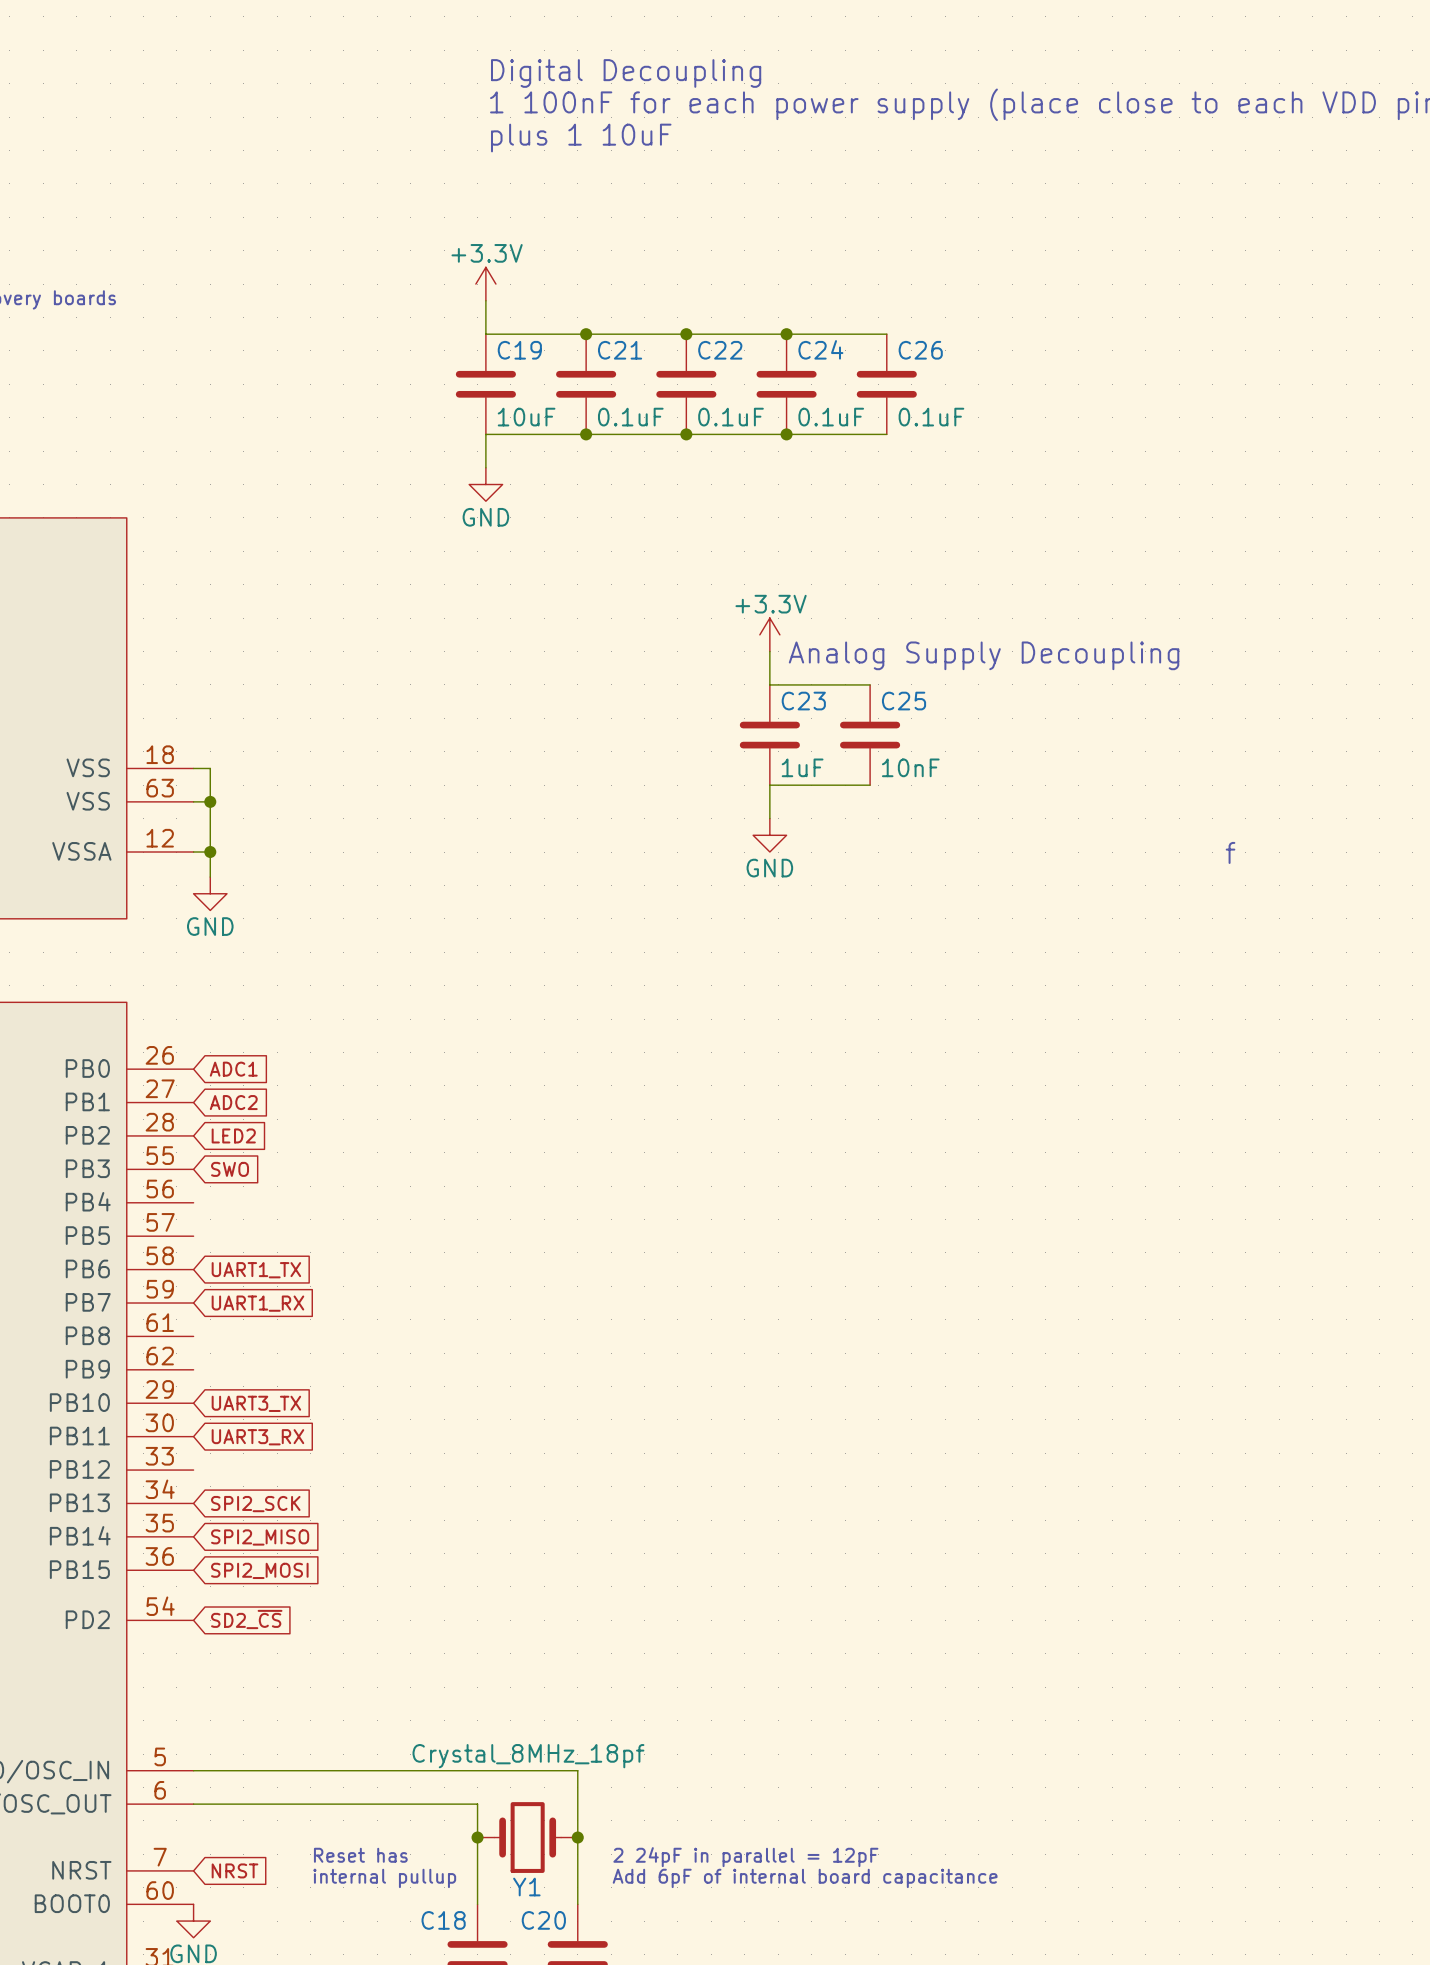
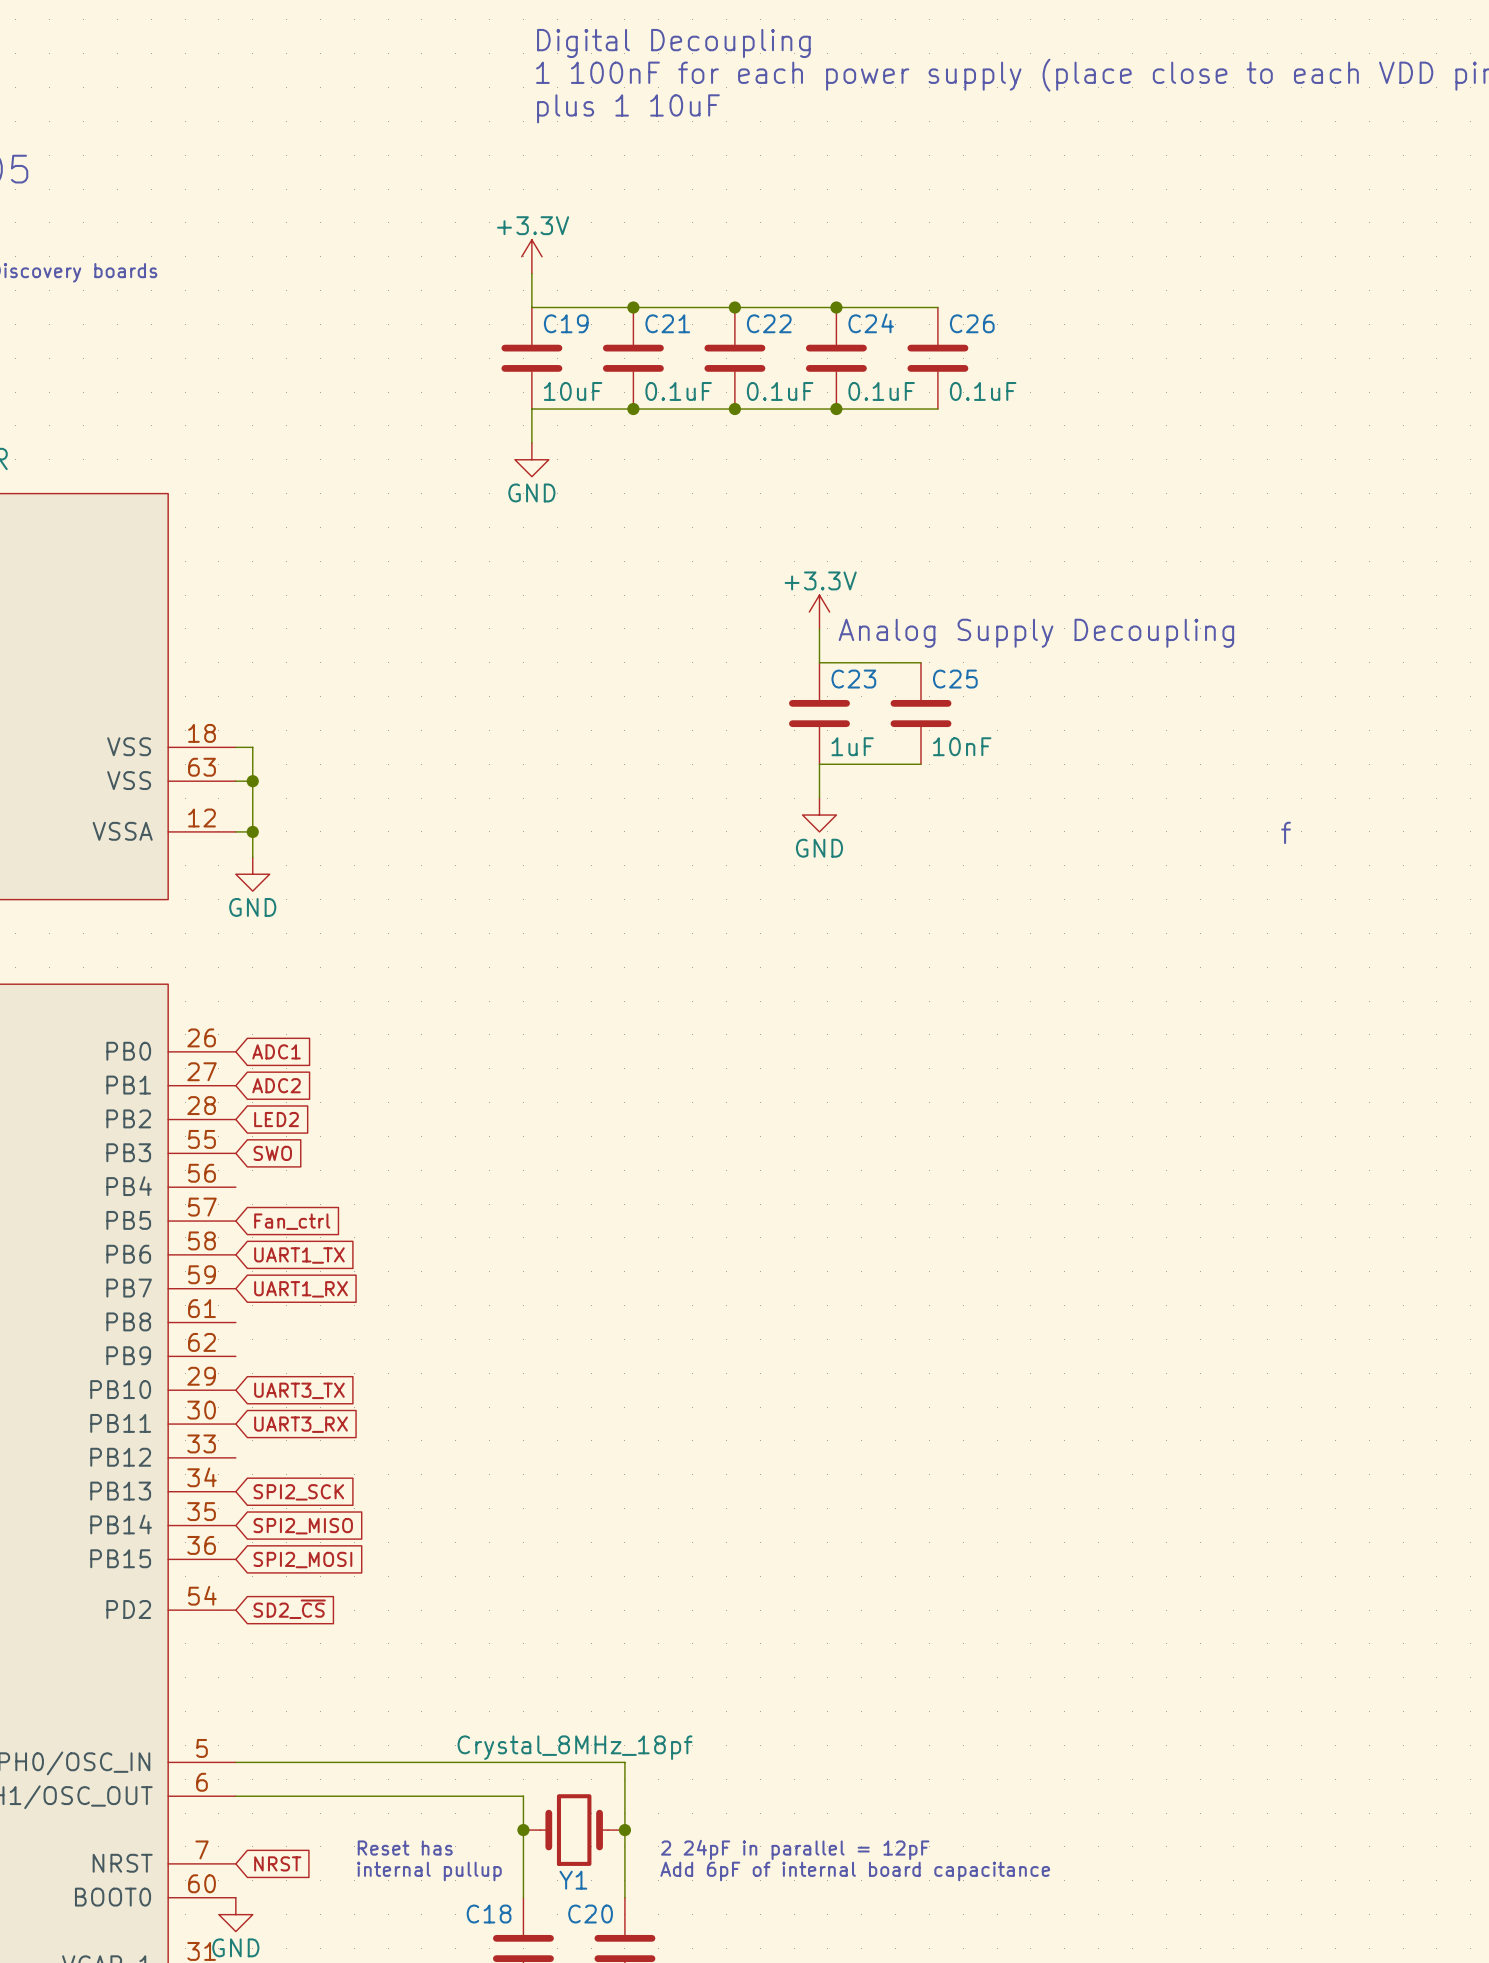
global label: none -> Fan_ctrl (292, 1221)

